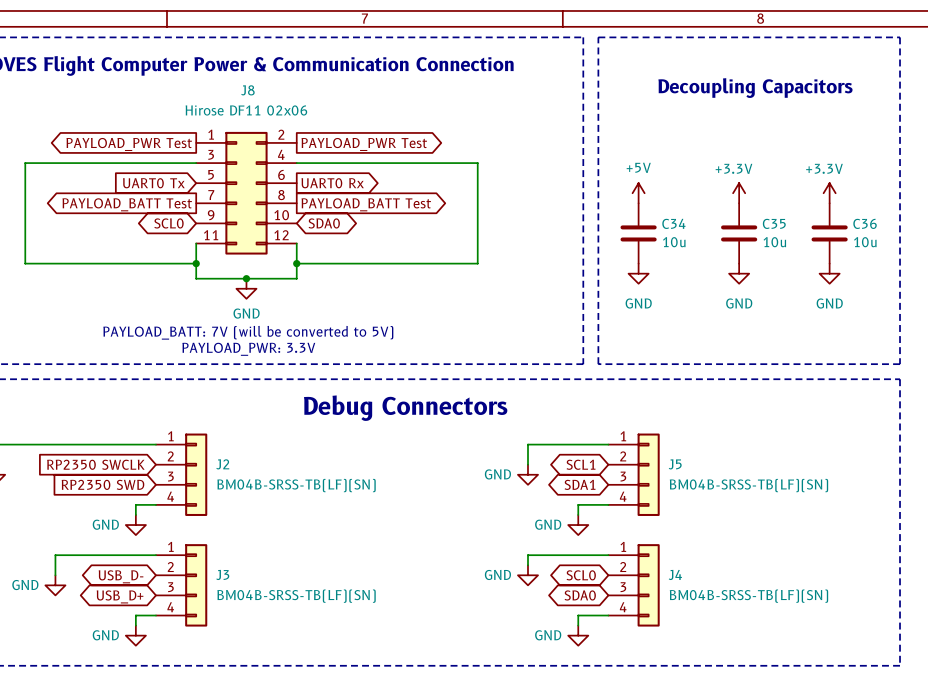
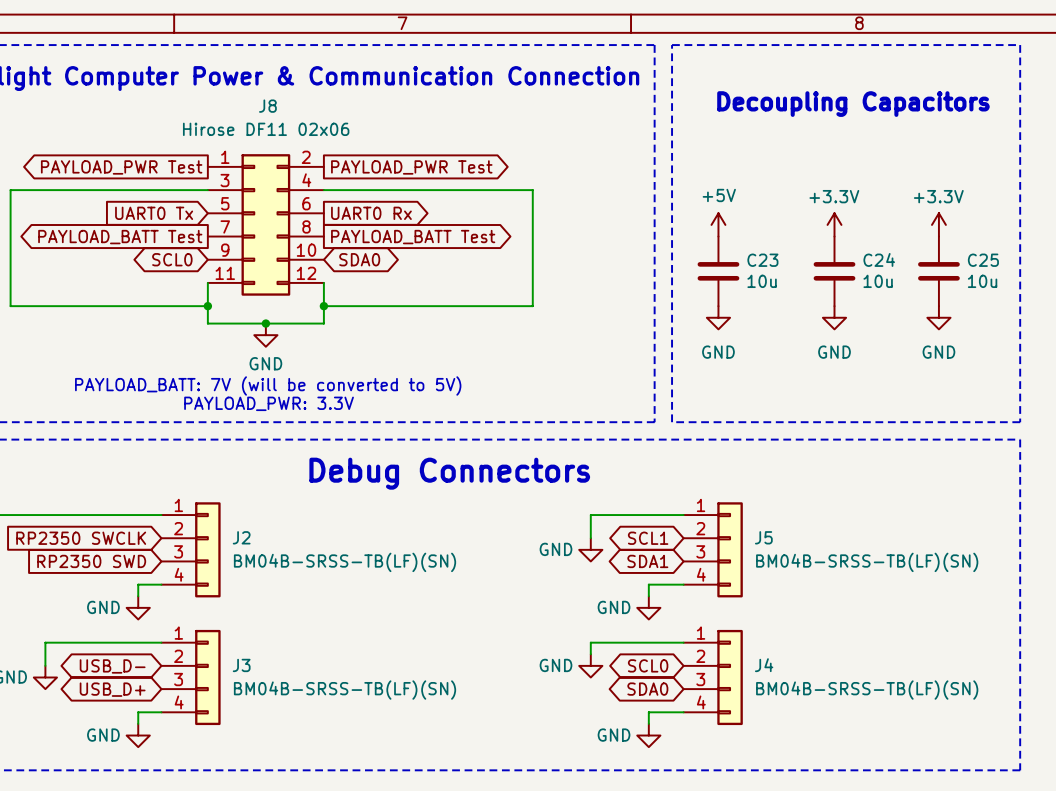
C34 name: C34 (673, 223) -> C23 (762, 260)
C35 name: C35 (774, 223) -> C24 (879, 259)
C36 name: C36 (865, 223) -> C25 (983, 260)

